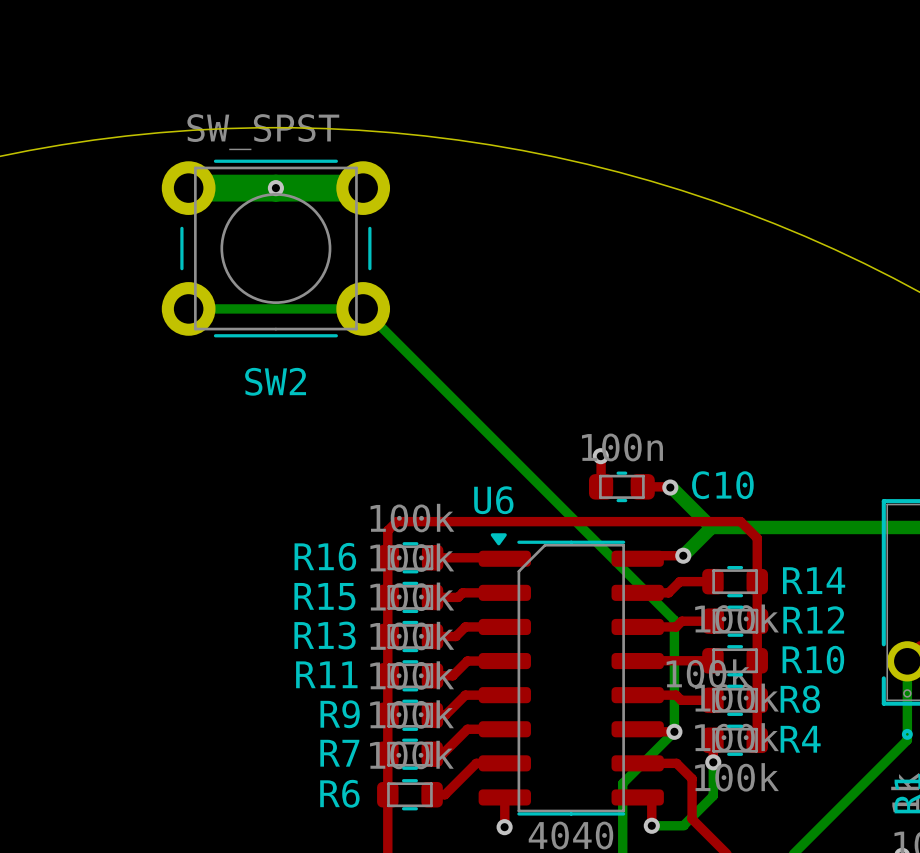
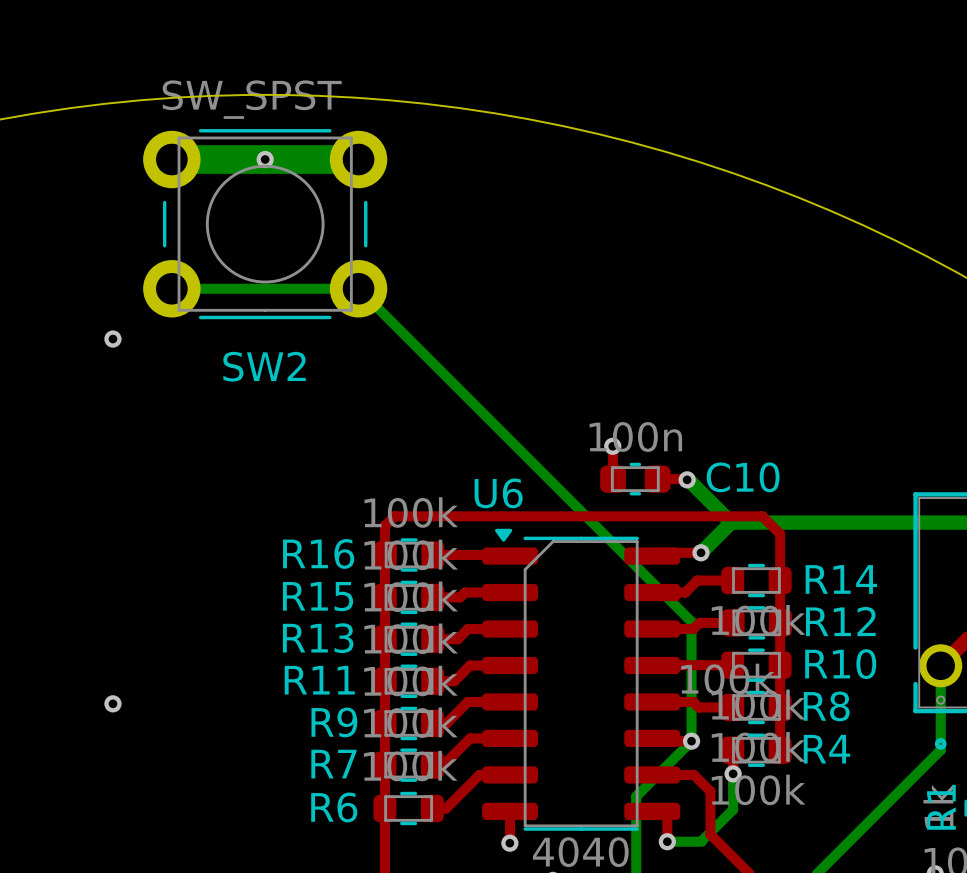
via: none -> (112, 339)
via: none -> (112, 703)

